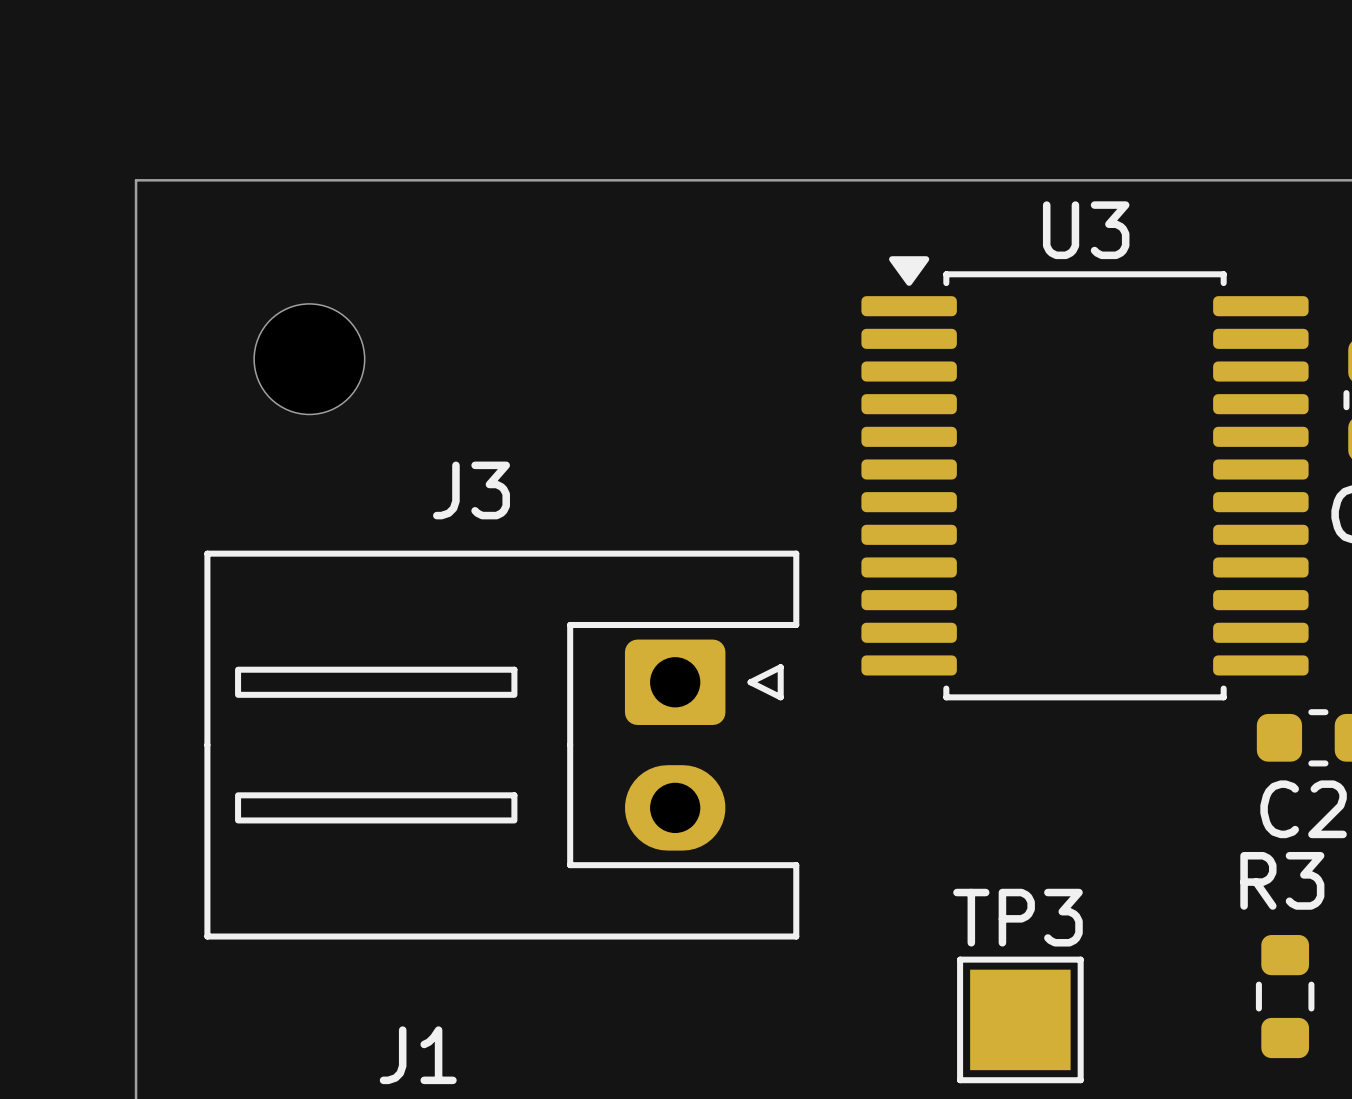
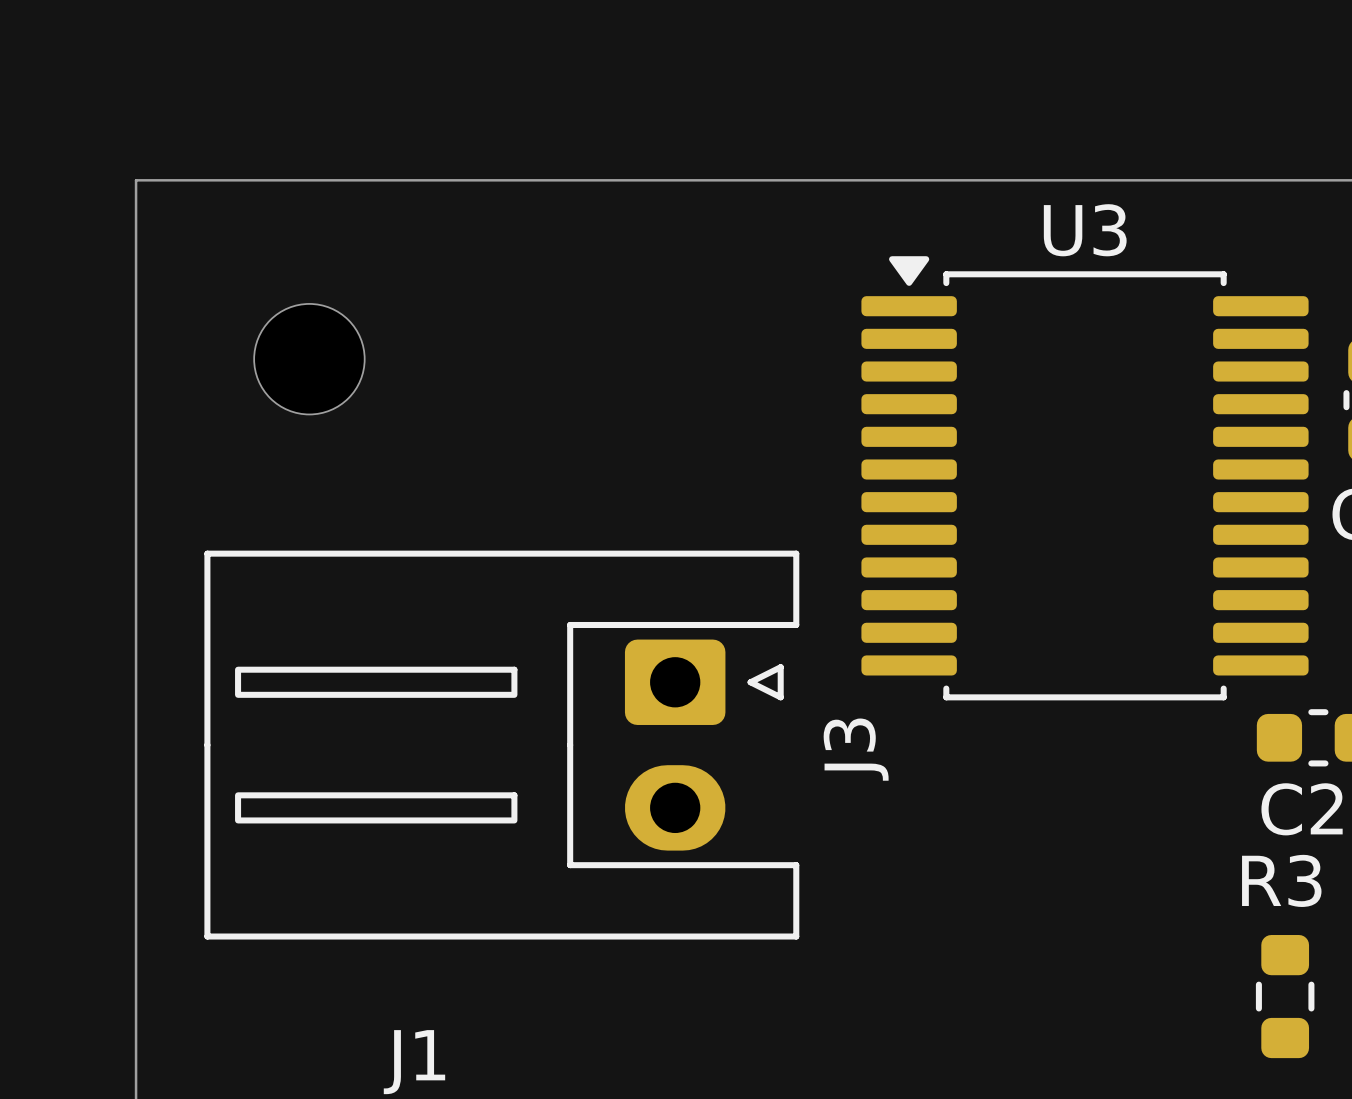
J3 name rotation: 0° (471, 490) -> 90° counterclockwise (856, 749)
J3 name position: J3 (471, 490) -> J3 (856, 749)
TP3: (1020, 1019) -> none

